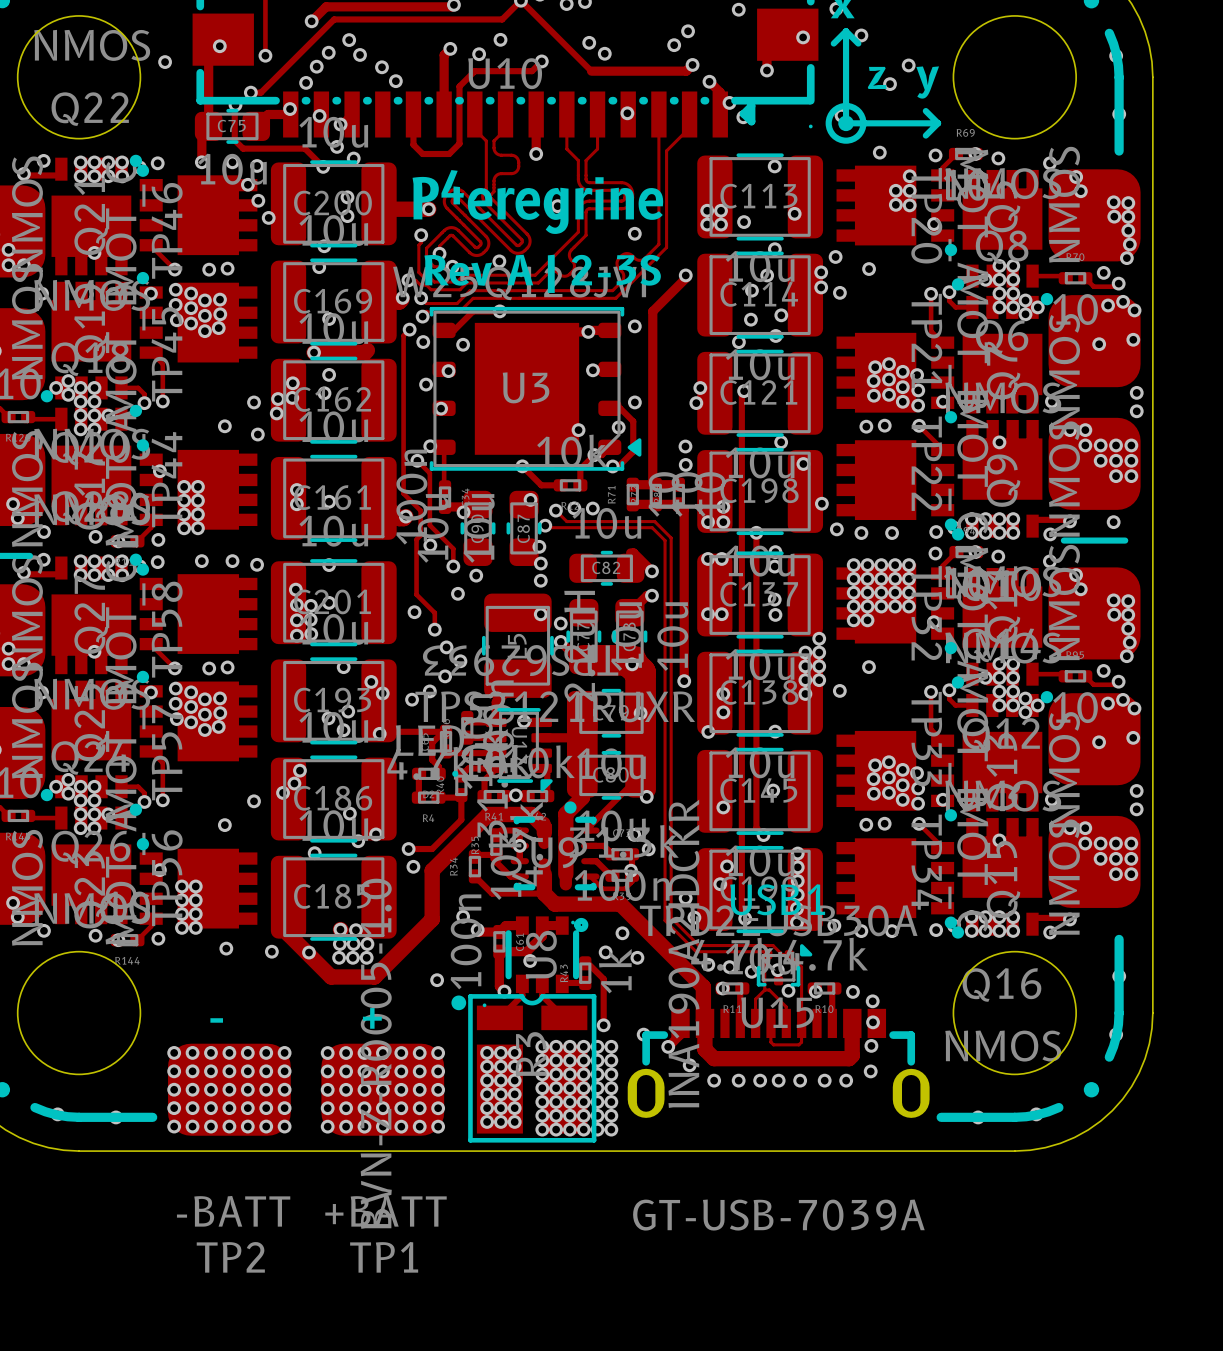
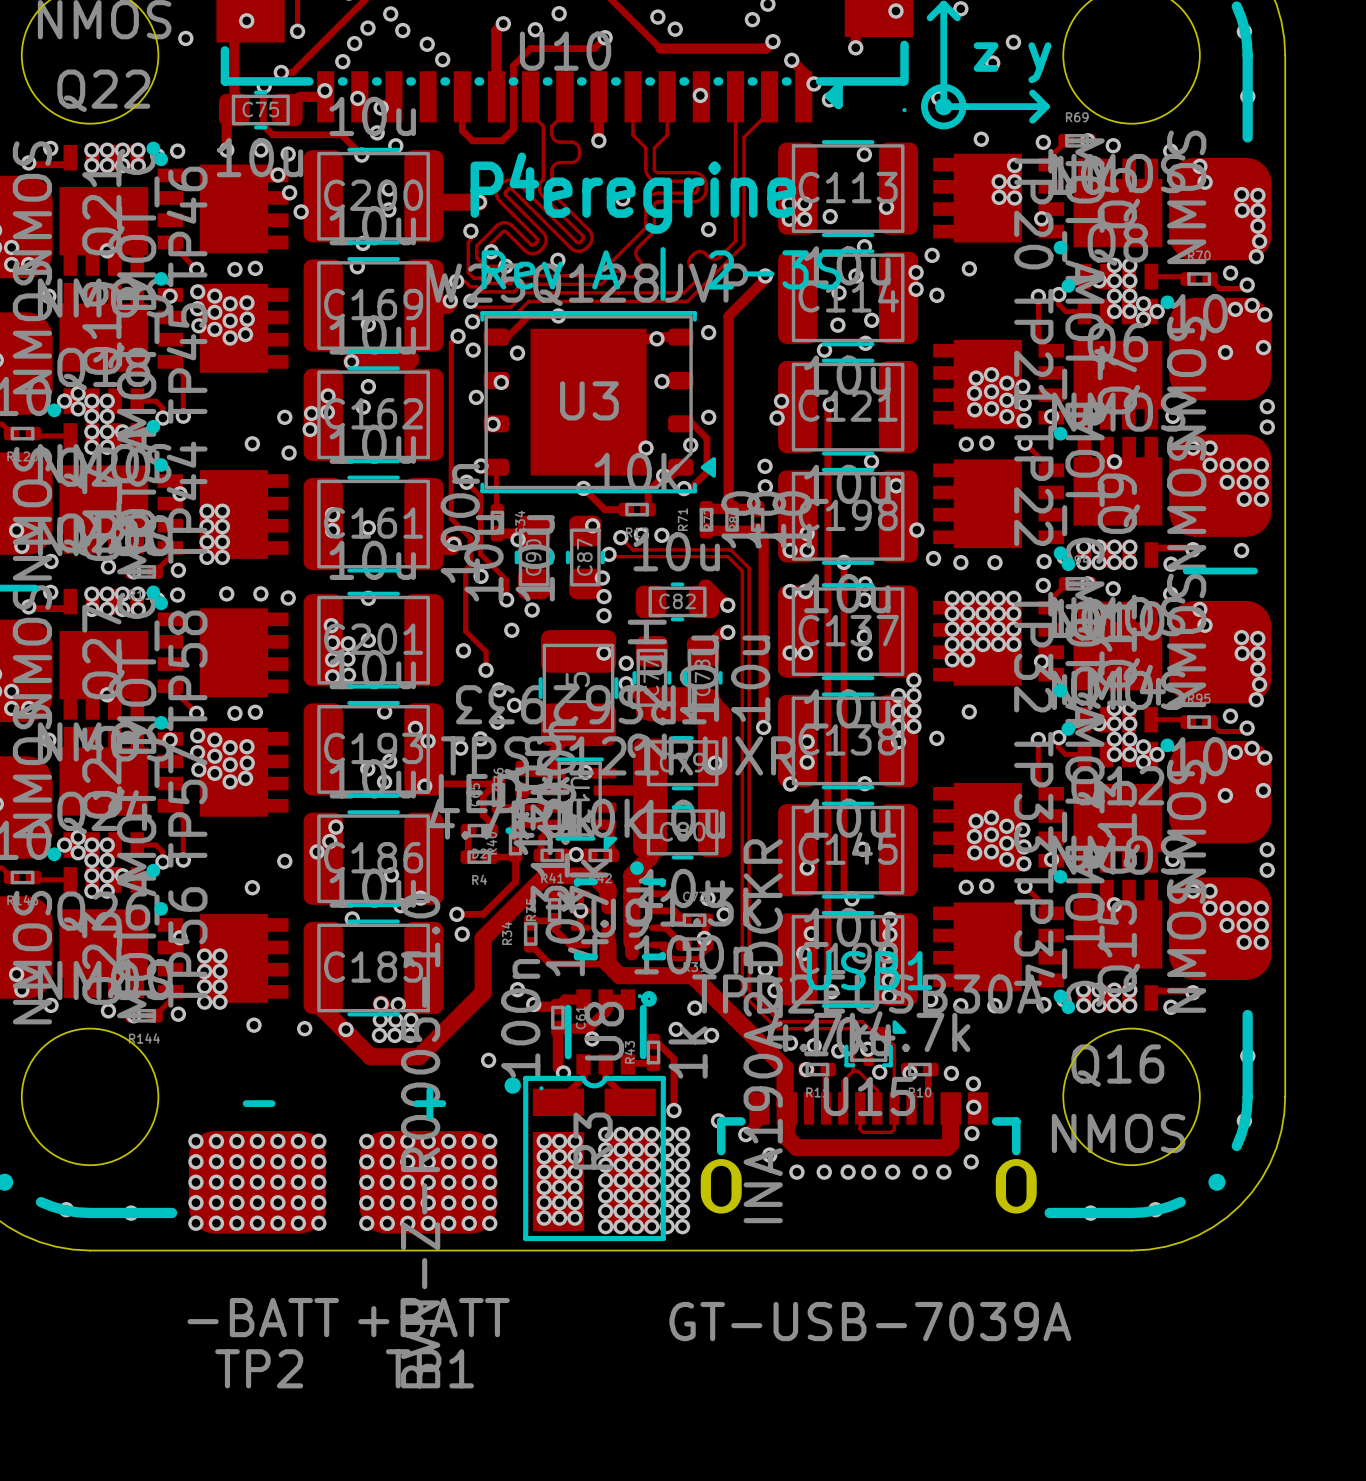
via: (632, 664) -> none
track: (640, 775) (590, 825) (590, 830) -> none
via: (646, 796) -> none

